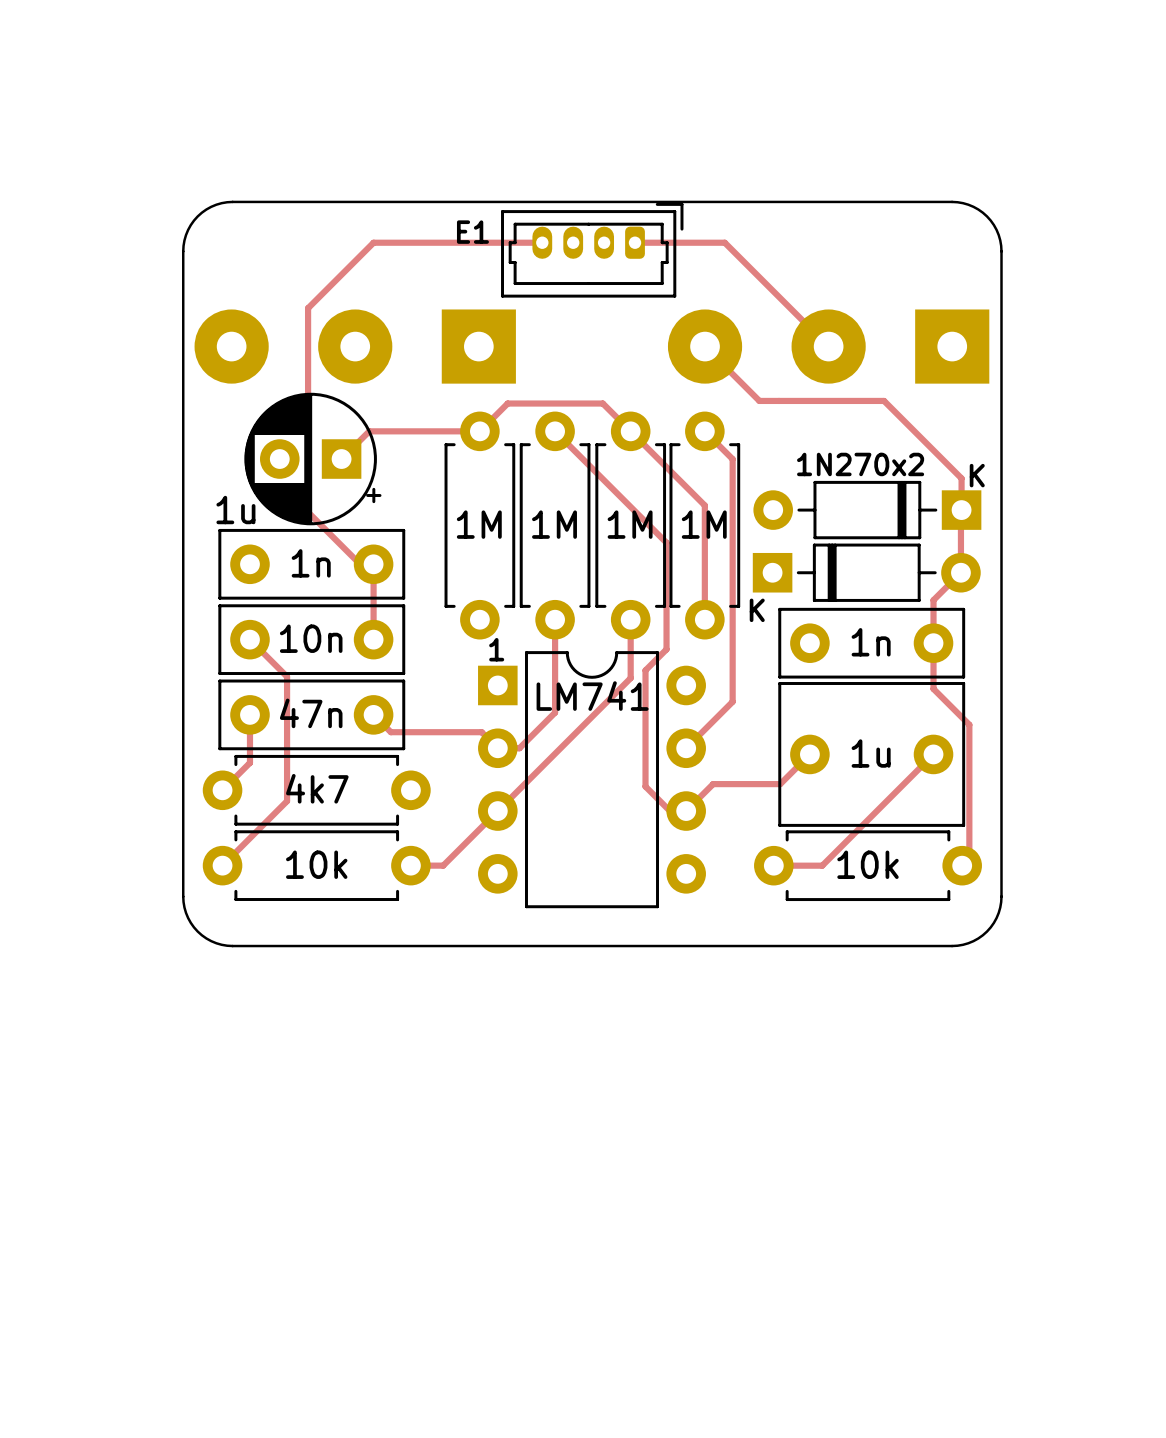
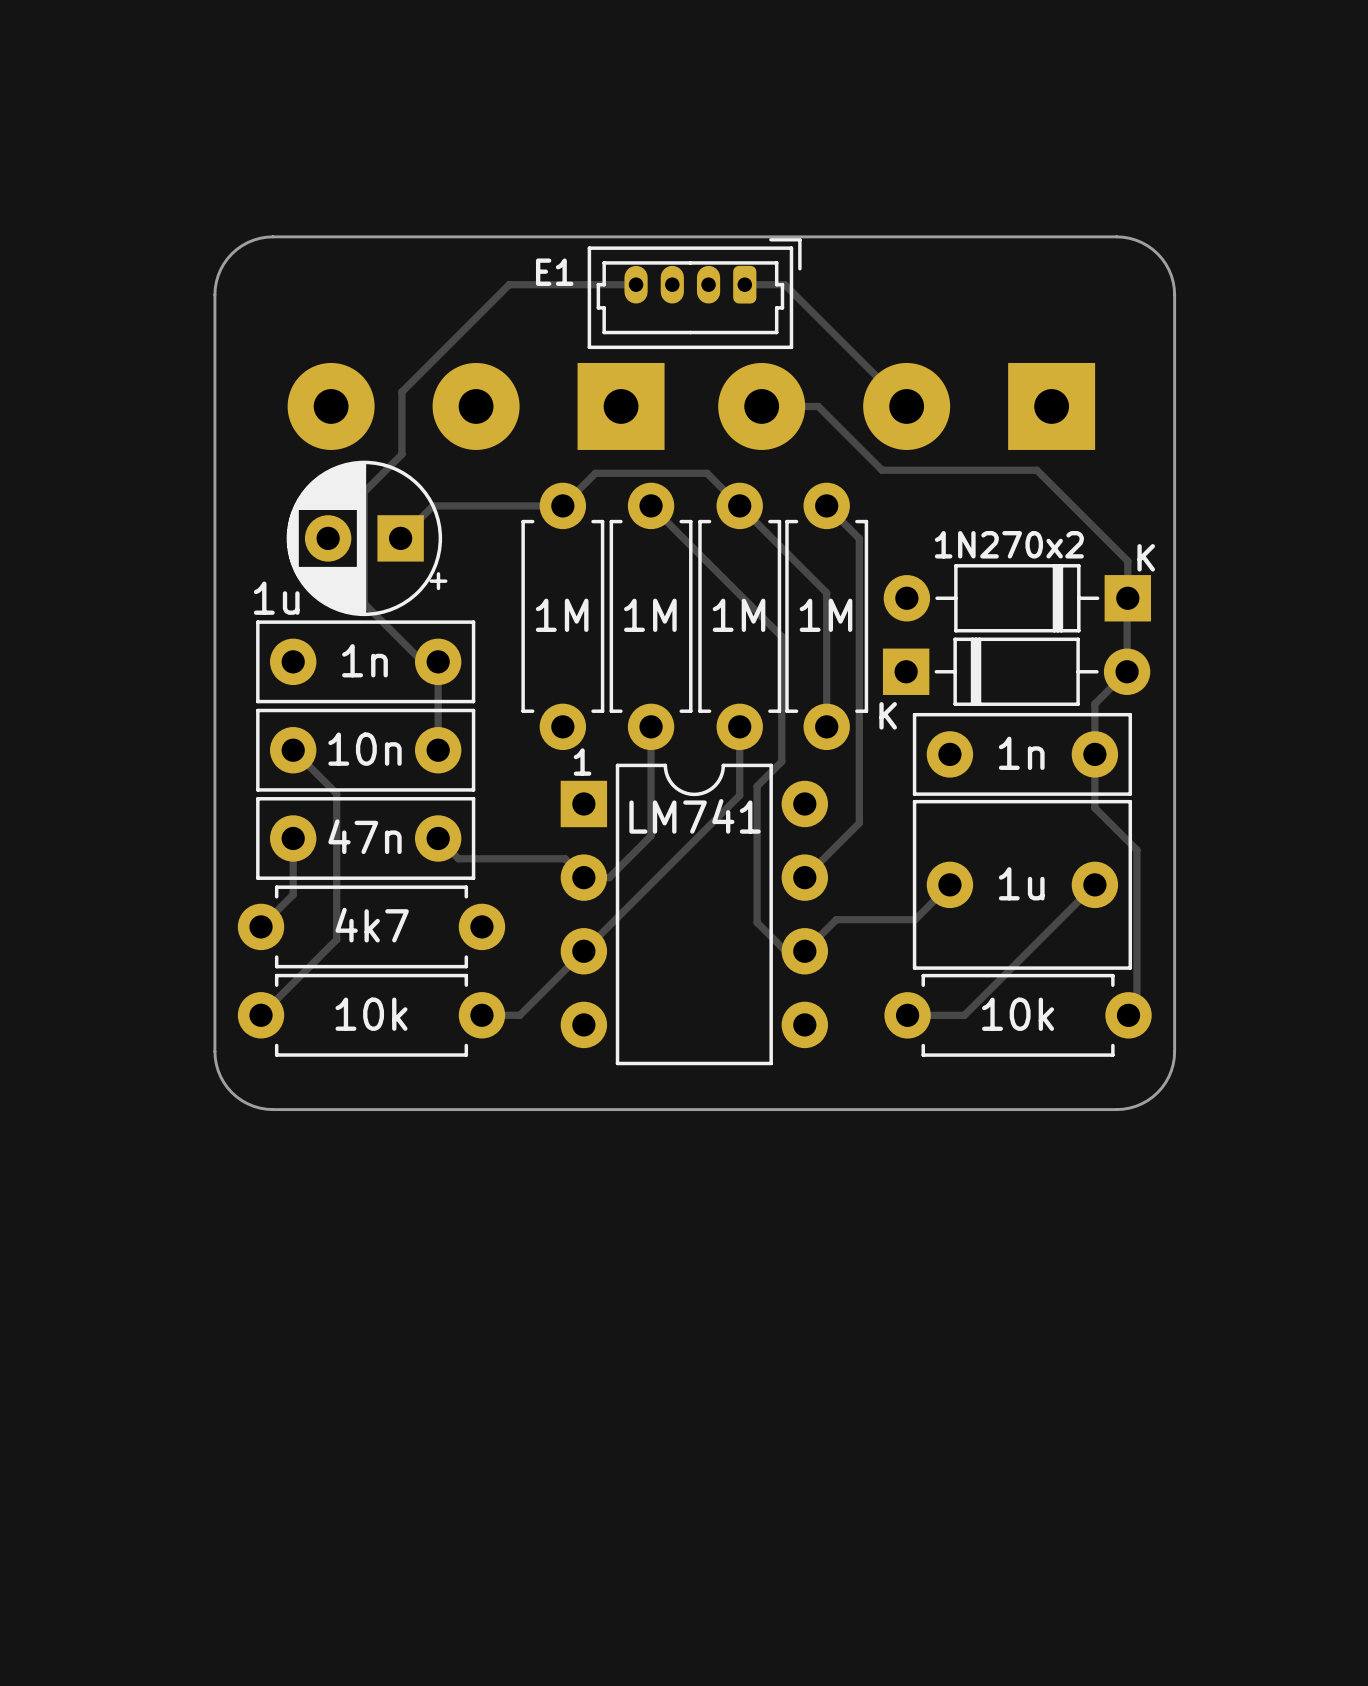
track: (434, 242) (373, 242) (308, 308) (308, 512) (310, 514) -> (509, 284) (401, 391) (401, 454) (364, 492) (364, 603)
track: (669, 242) (724, 242) (828, 346) -> (784, 284) (906, 406)
part position: (355, 346) -> (476, 406)
track: (705, 346) (759, 400) -> (761, 406) (818, 406) (882, 470) (890, 470)
part position: (828, 346) -> (906, 406)

